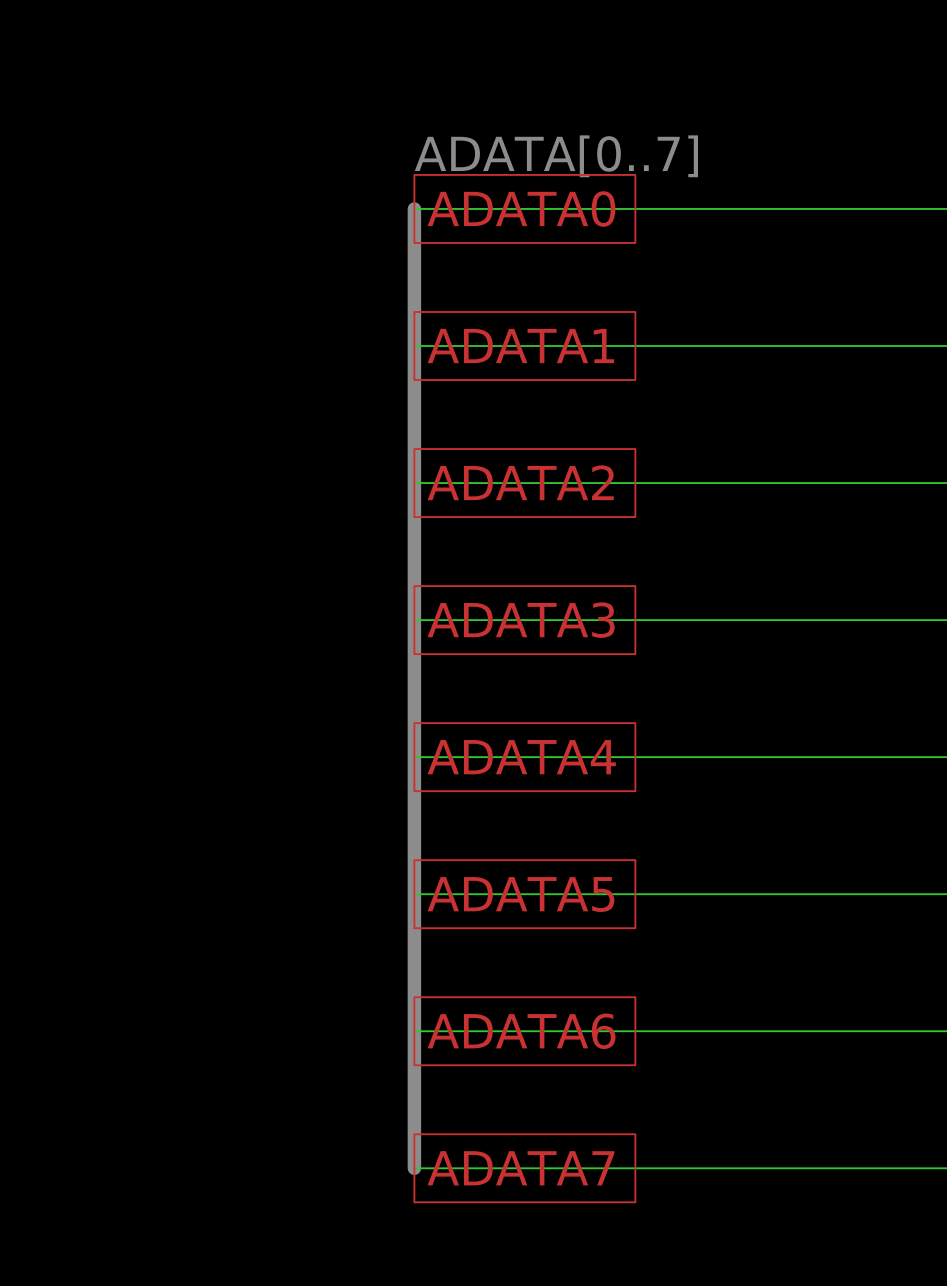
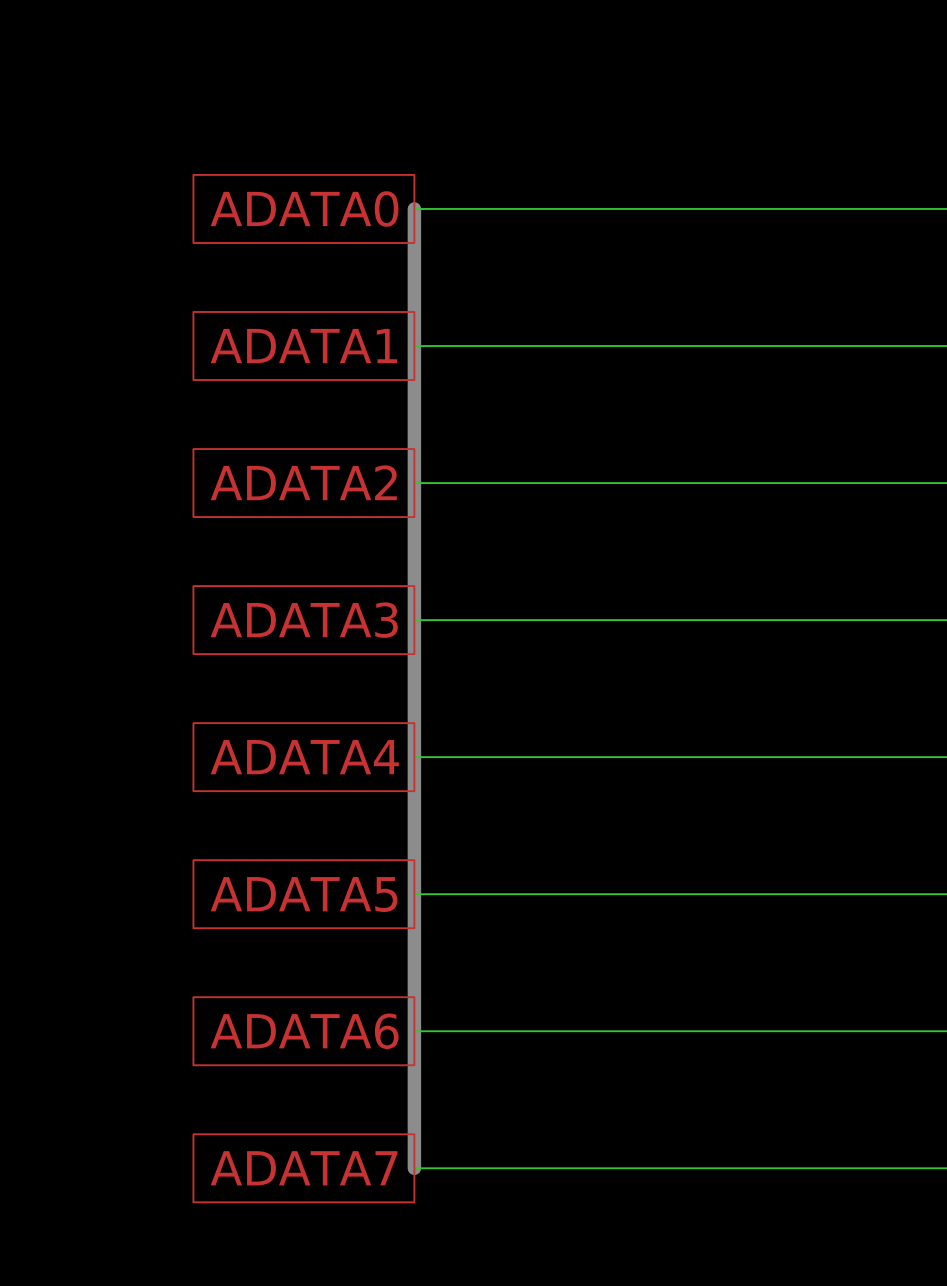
text: ADATA[0..7] (556, 156) -> none
global label rotation: 0° (521, 208) -> 180° (304, 208)
global label rotation: 0° (520, 346) -> 180° (303, 346)
global label rotation: 0° (520, 482) -> 180° (303, 482)
global label rotation: 0° (521, 620) -> 180° (304, 620)
global label rotation: 0° (521, 757) -> 180° (304, 757)
global label rotation: 0° (520, 894) -> 180° (304, 894)
global label rotation: 0° (521, 1031) -> 180° (304, 1031)
global label rotation: 0° (521, 1168) -> 180° (304, 1168)

